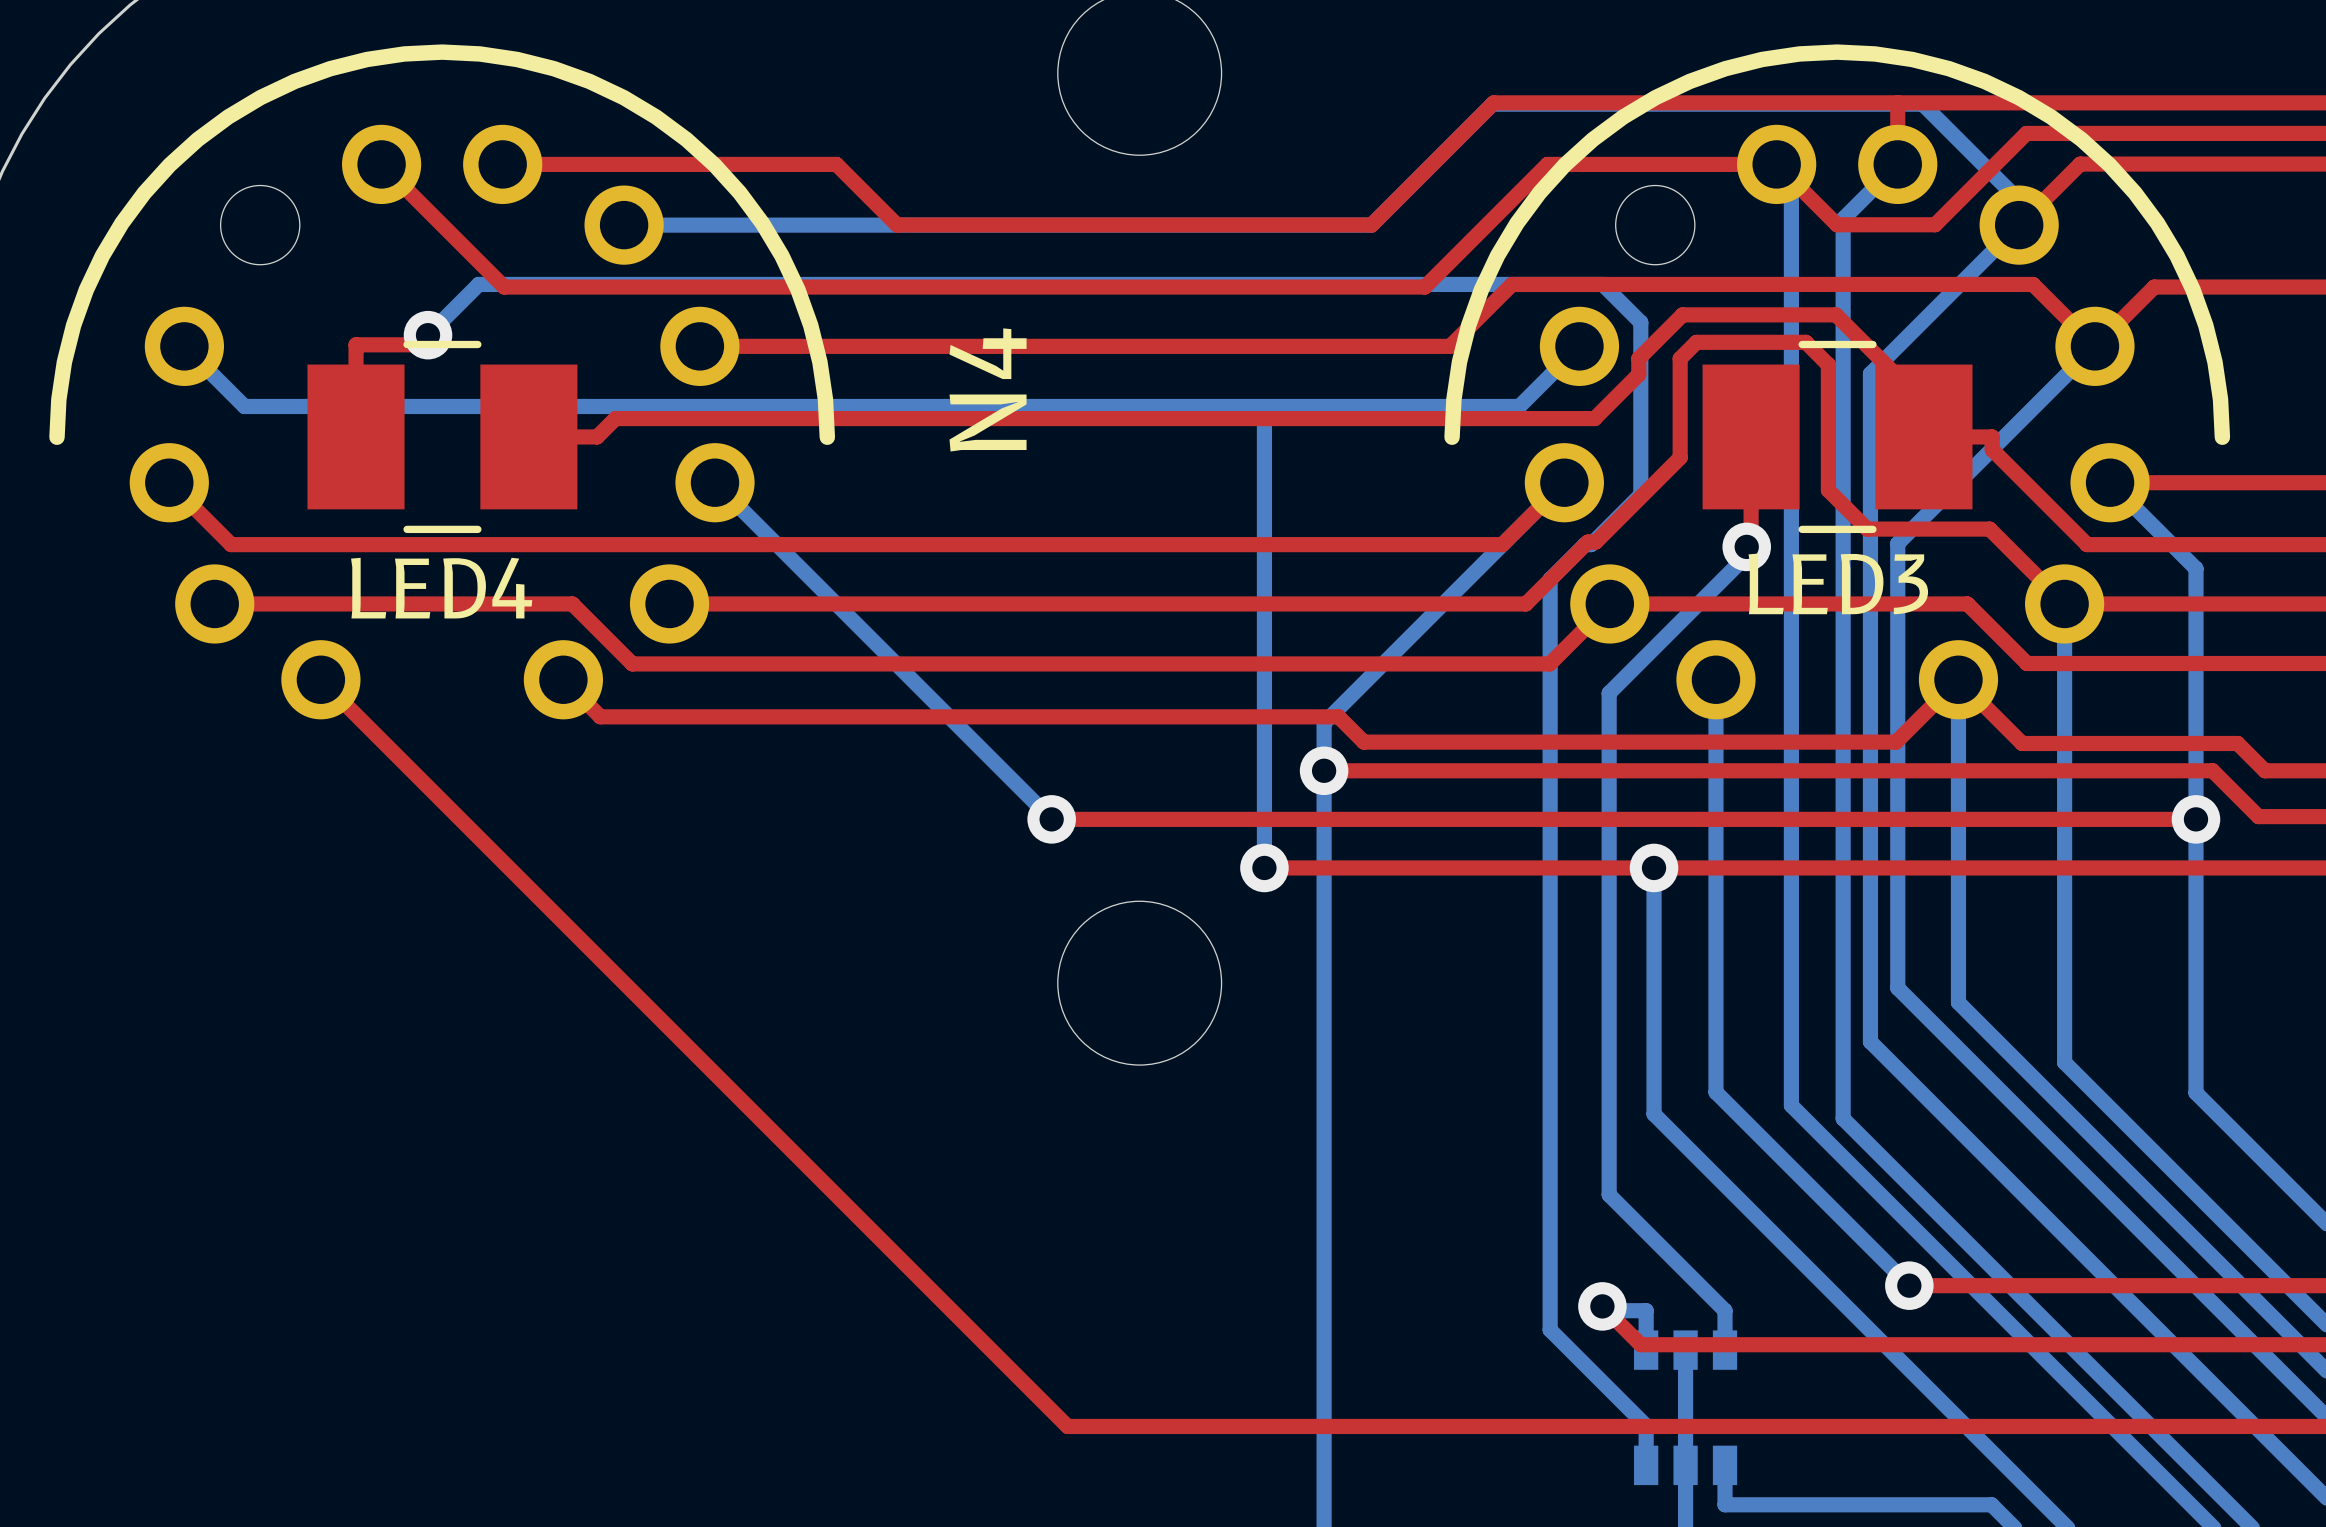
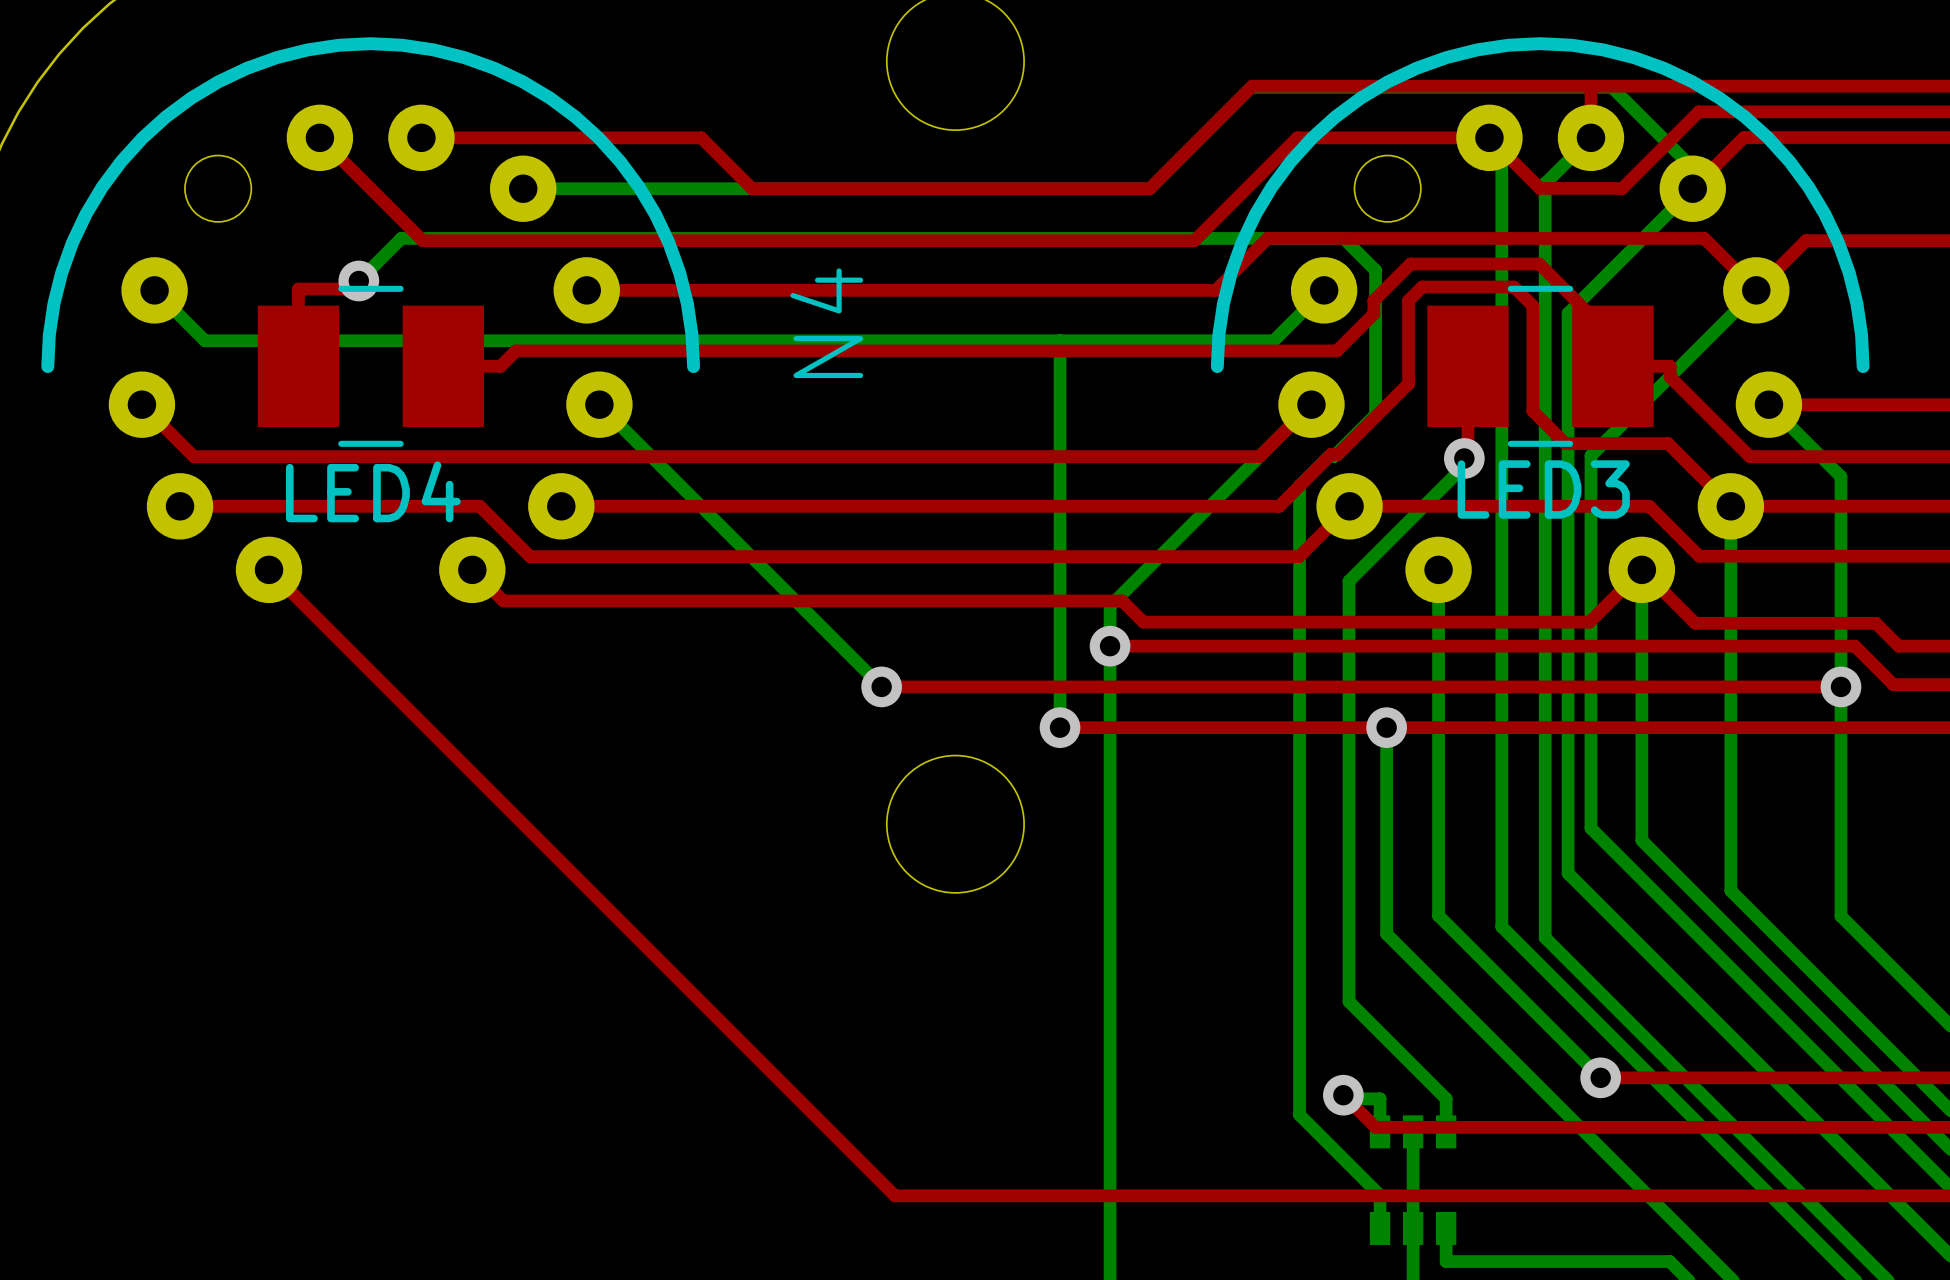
N4 footprint: [49, 44, 836, 720] -> [41, 37, 701, 604]
part footprint: [1444, 44, 2231, 720] -> [1210, 37, 1870, 604]

